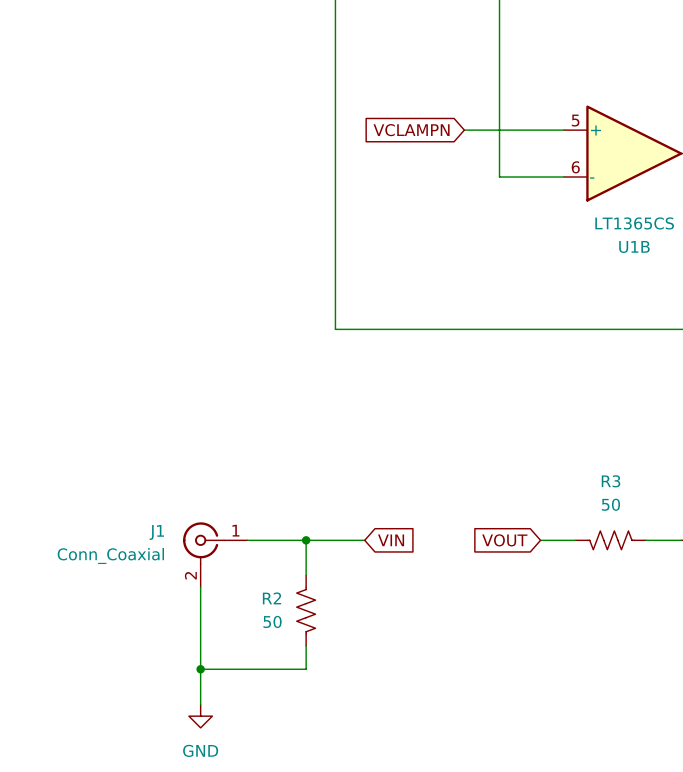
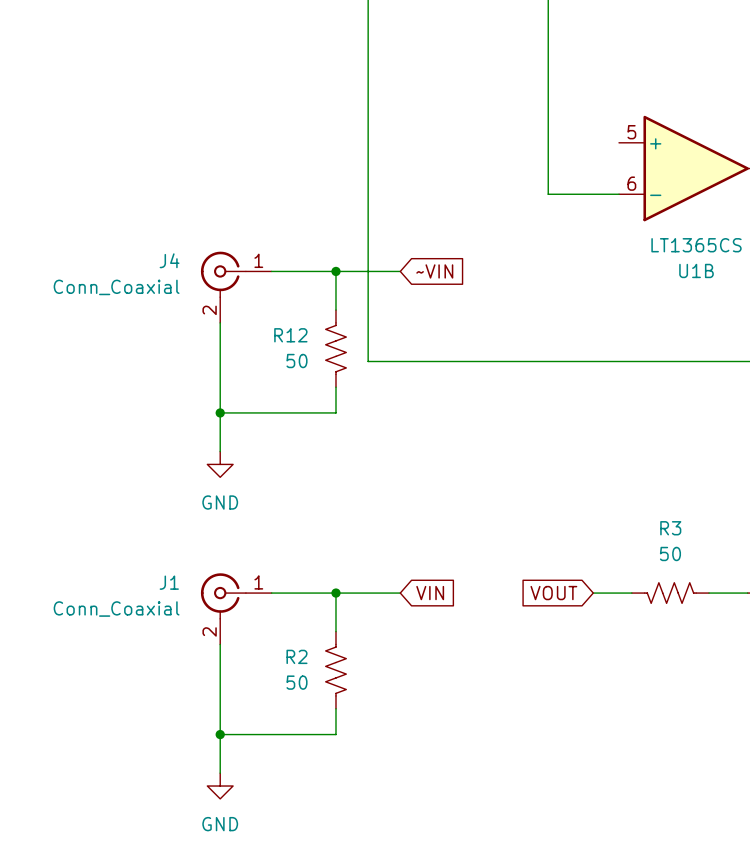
global label: VCLAMPN (411, 130) -> none
wire: (464, 130) (563, 130) -> none
wire: none -> (271, 271) (400, 271)
wire: none -> (335, 271) (335, 310)
junction: none -> (335, 271)
global label: none -> ~VIN (434, 271)
J4: none -> Conn_Coaxial (236, 287)
wire: none -> (220, 322) (220, 451)
R12: none -> 50 (335, 348)
wire: none -> (335, 387) (335, 412) (220, 412)
junction: none -> (220, 412)
power symbol: none -> GND (220, 464)

